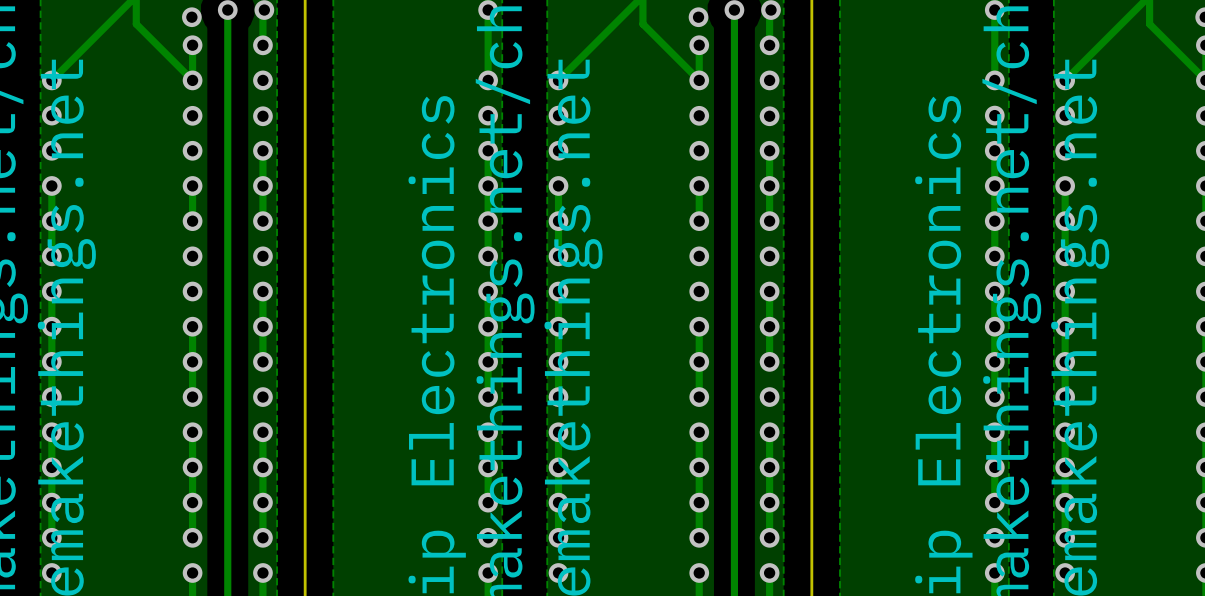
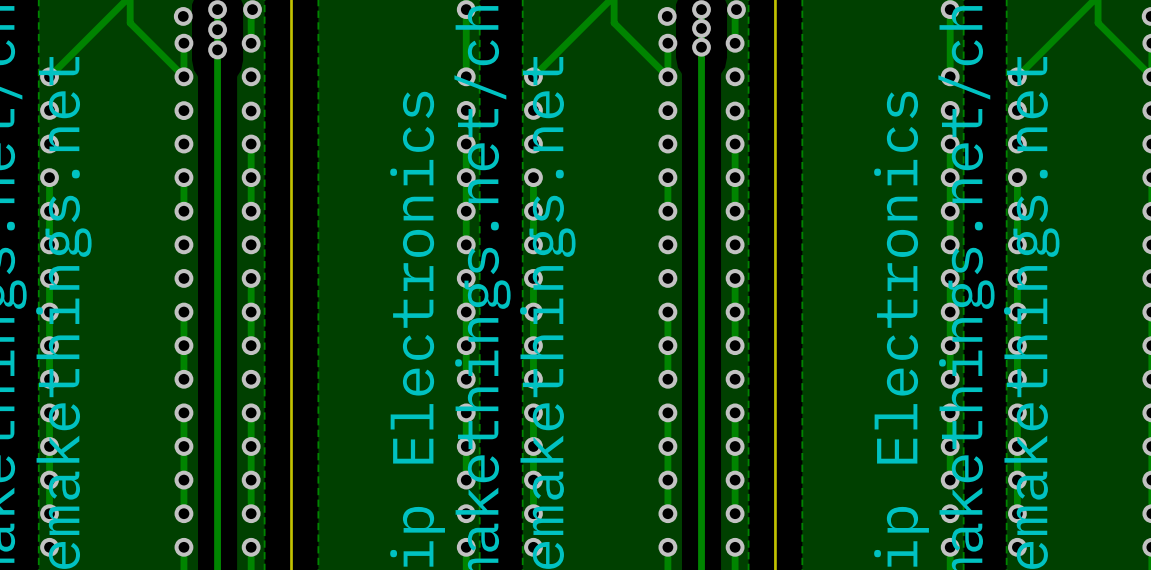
via: none -> (701, 28)
via: none -> (217, 29)
via: none -> (701, 47)
via: none -> (217, 49)

